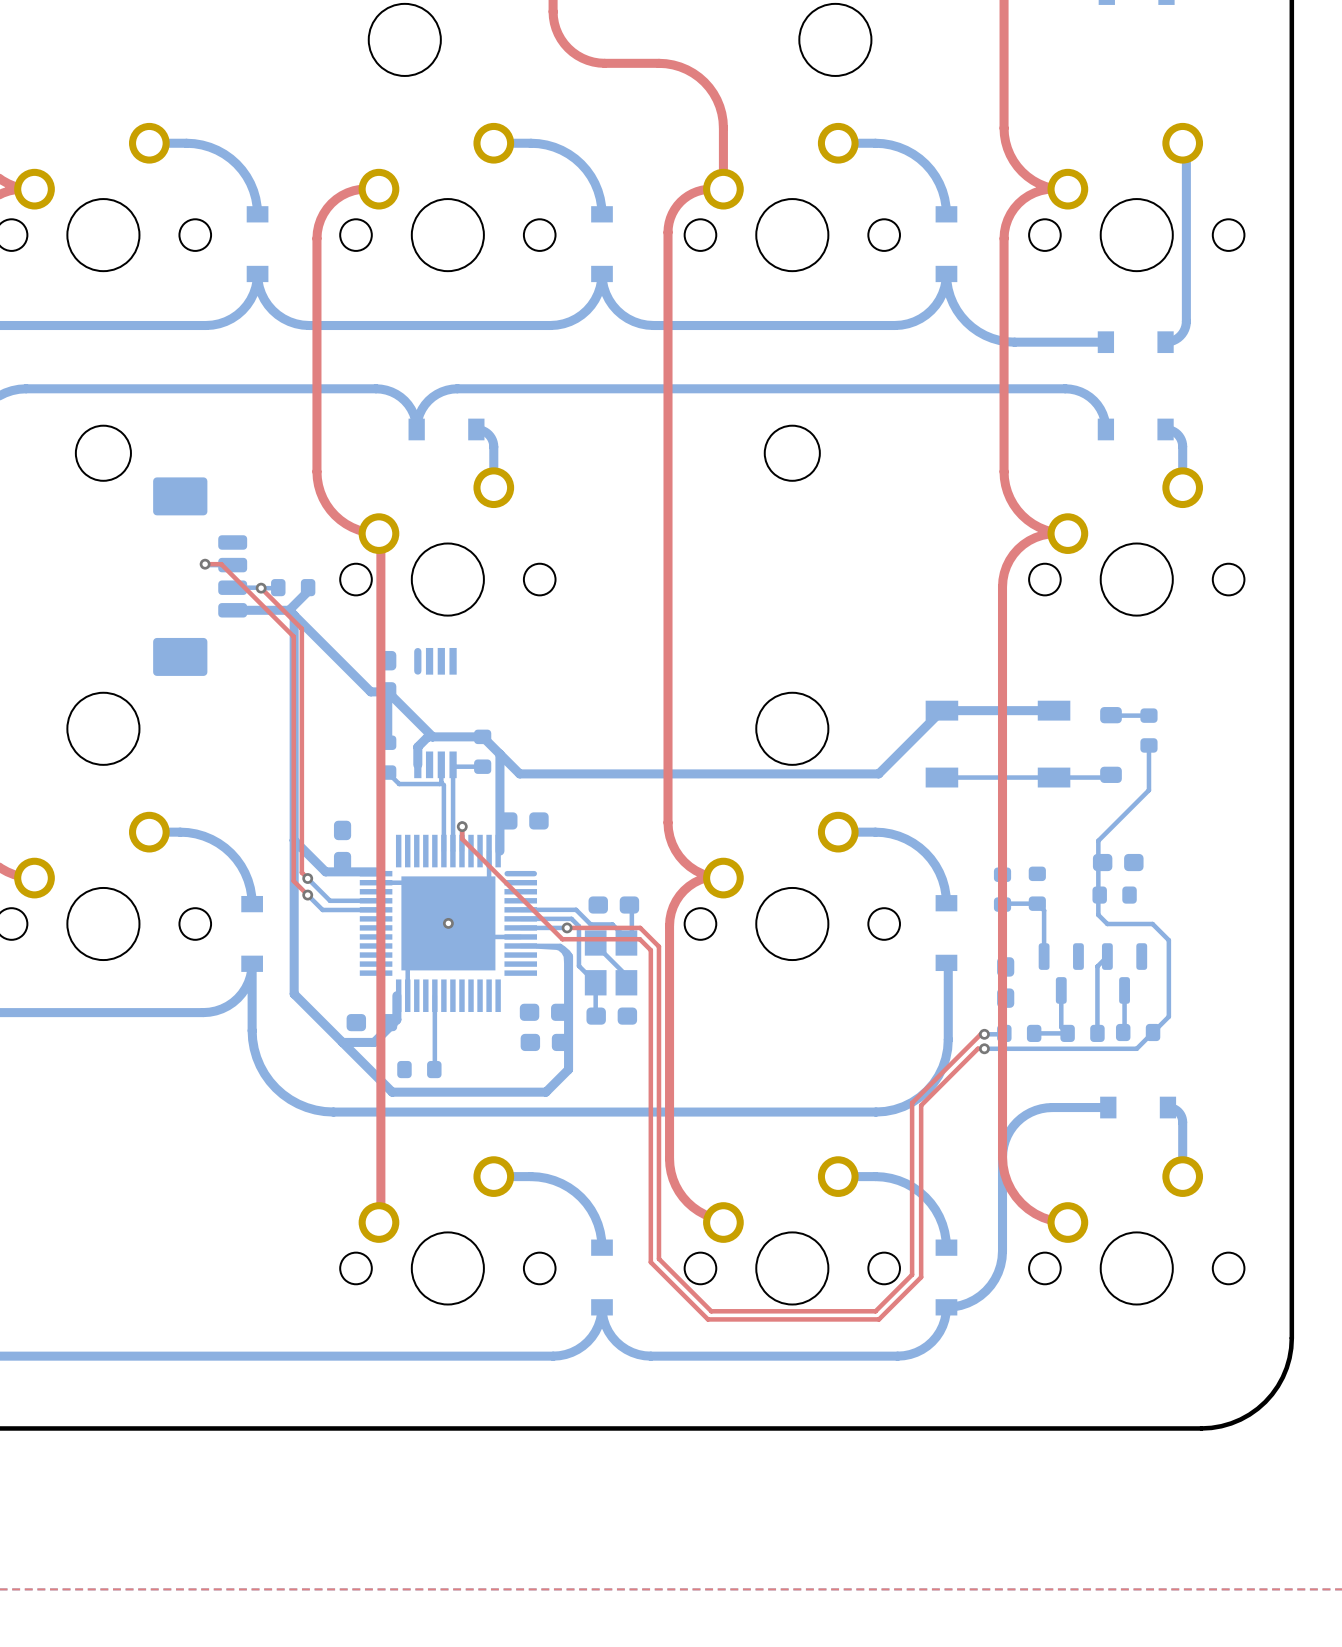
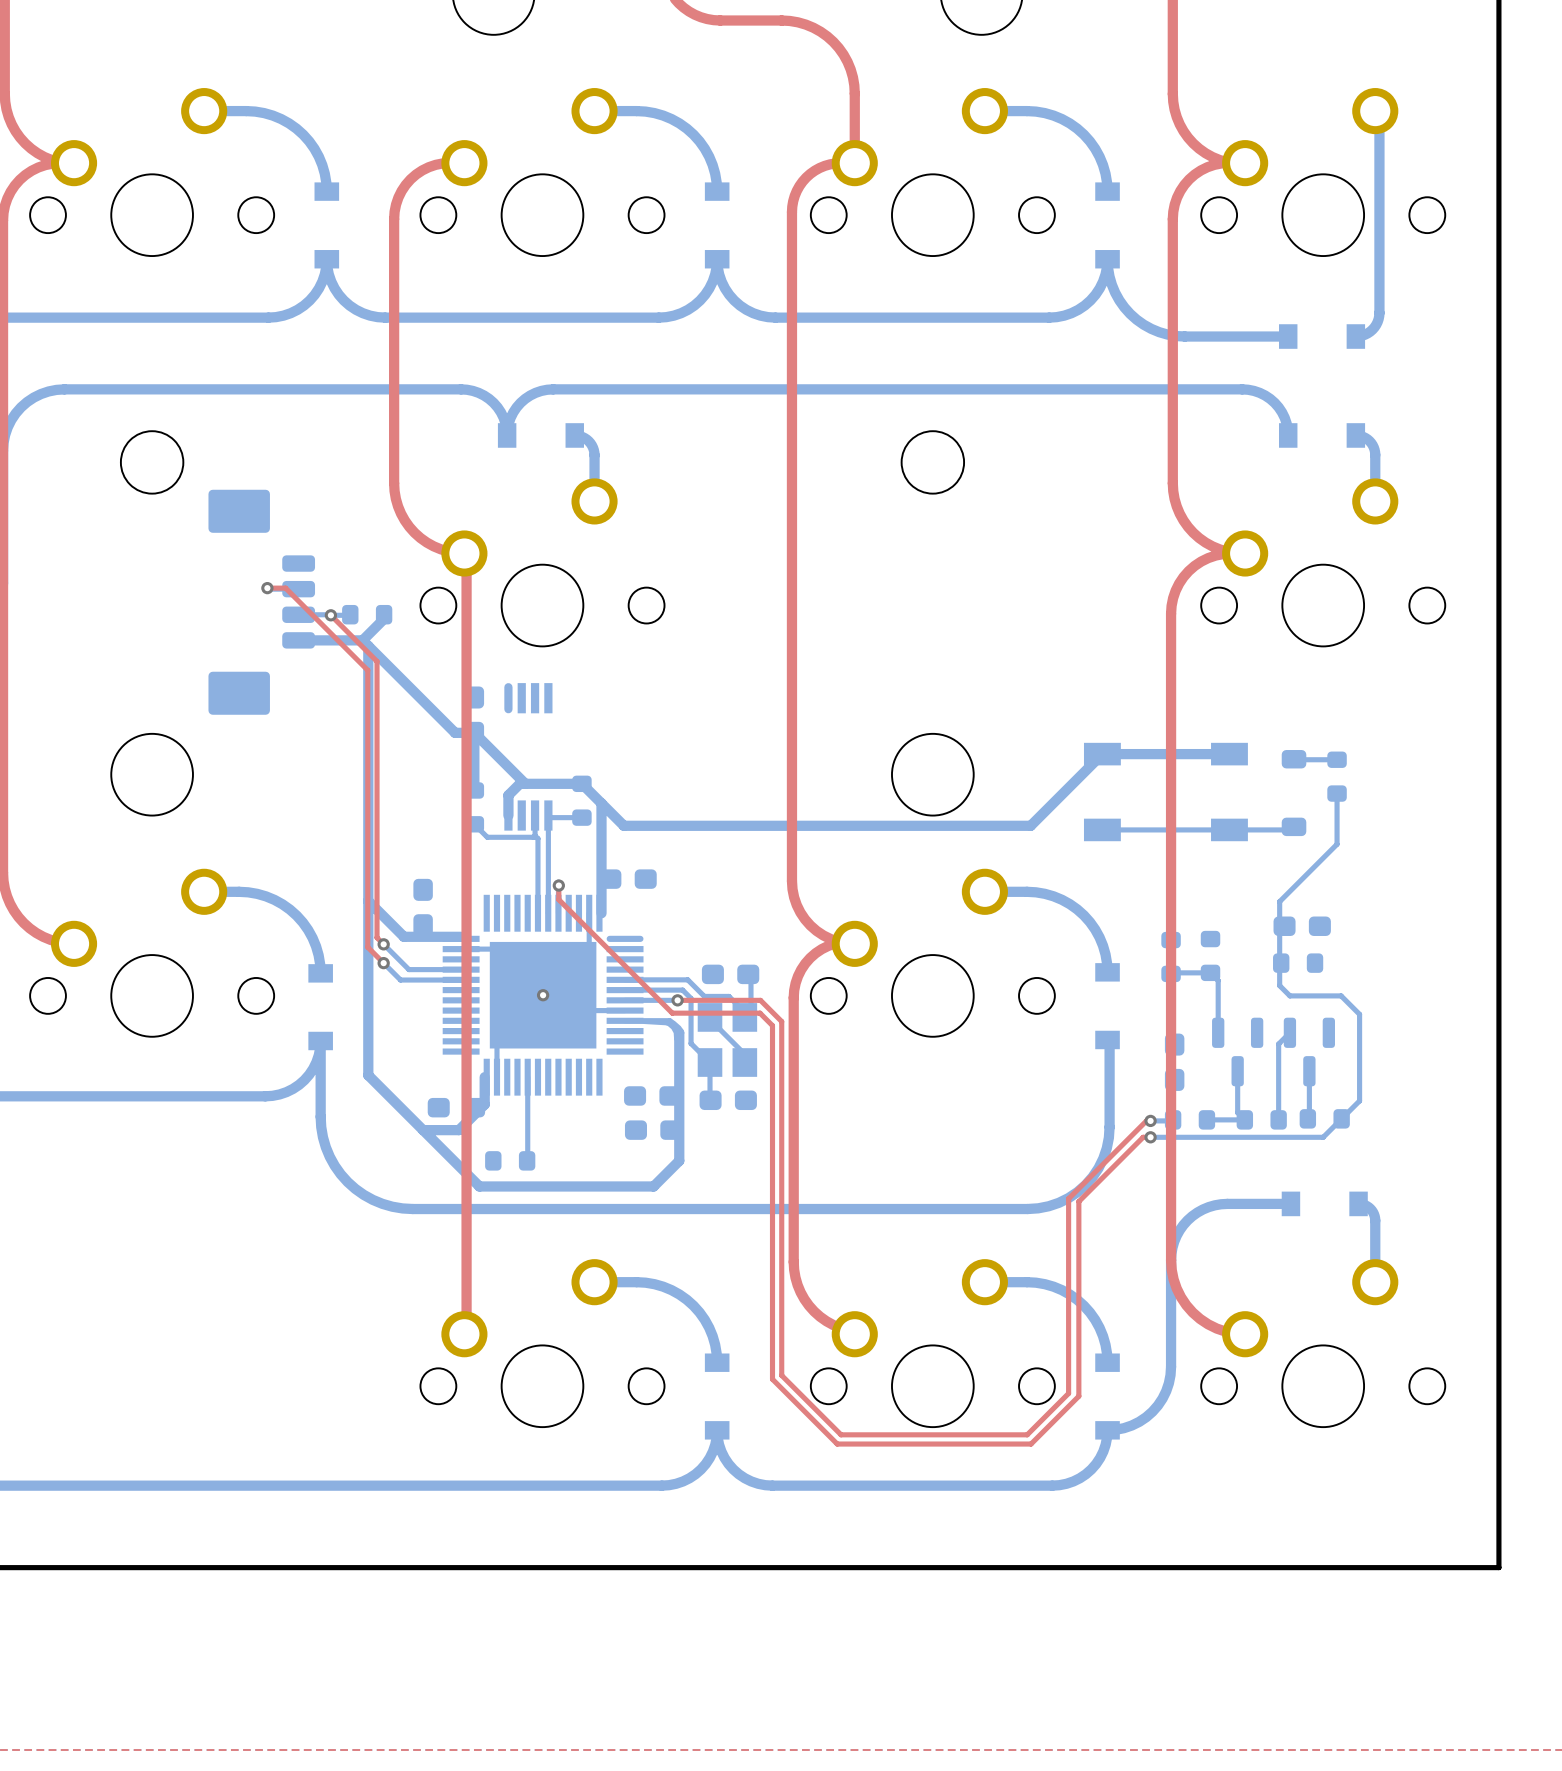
board edge: (1291, 1338) (1286, 1367) (1277, 1386) (1265, 1401) (1249, 1414) (1231, 1423) (1201, 1428) -> (1498, 1465) (1498, 1567) (1396, 1567)

